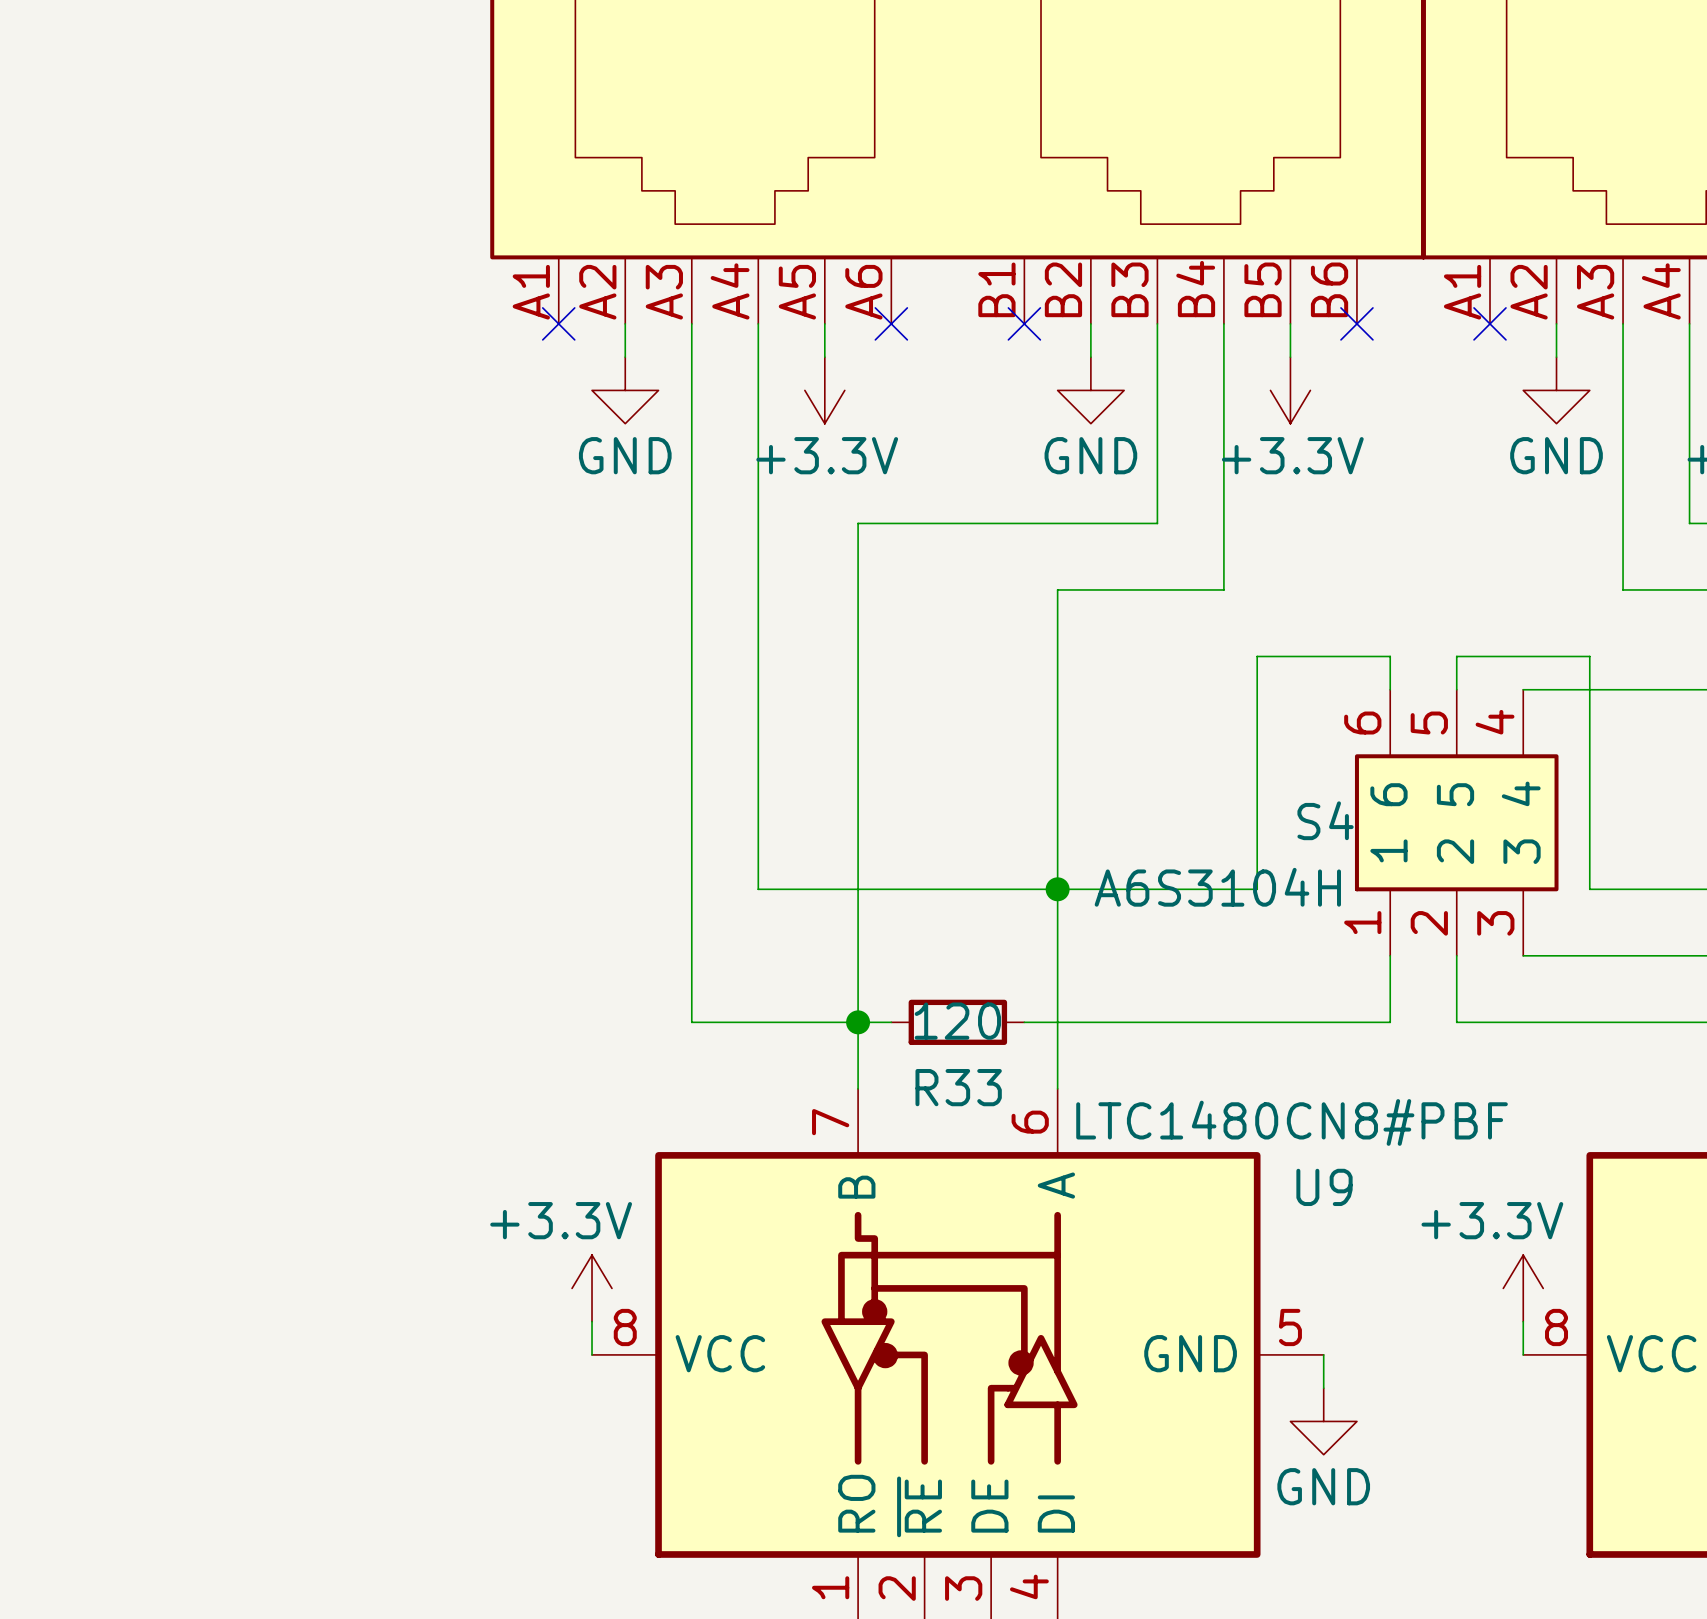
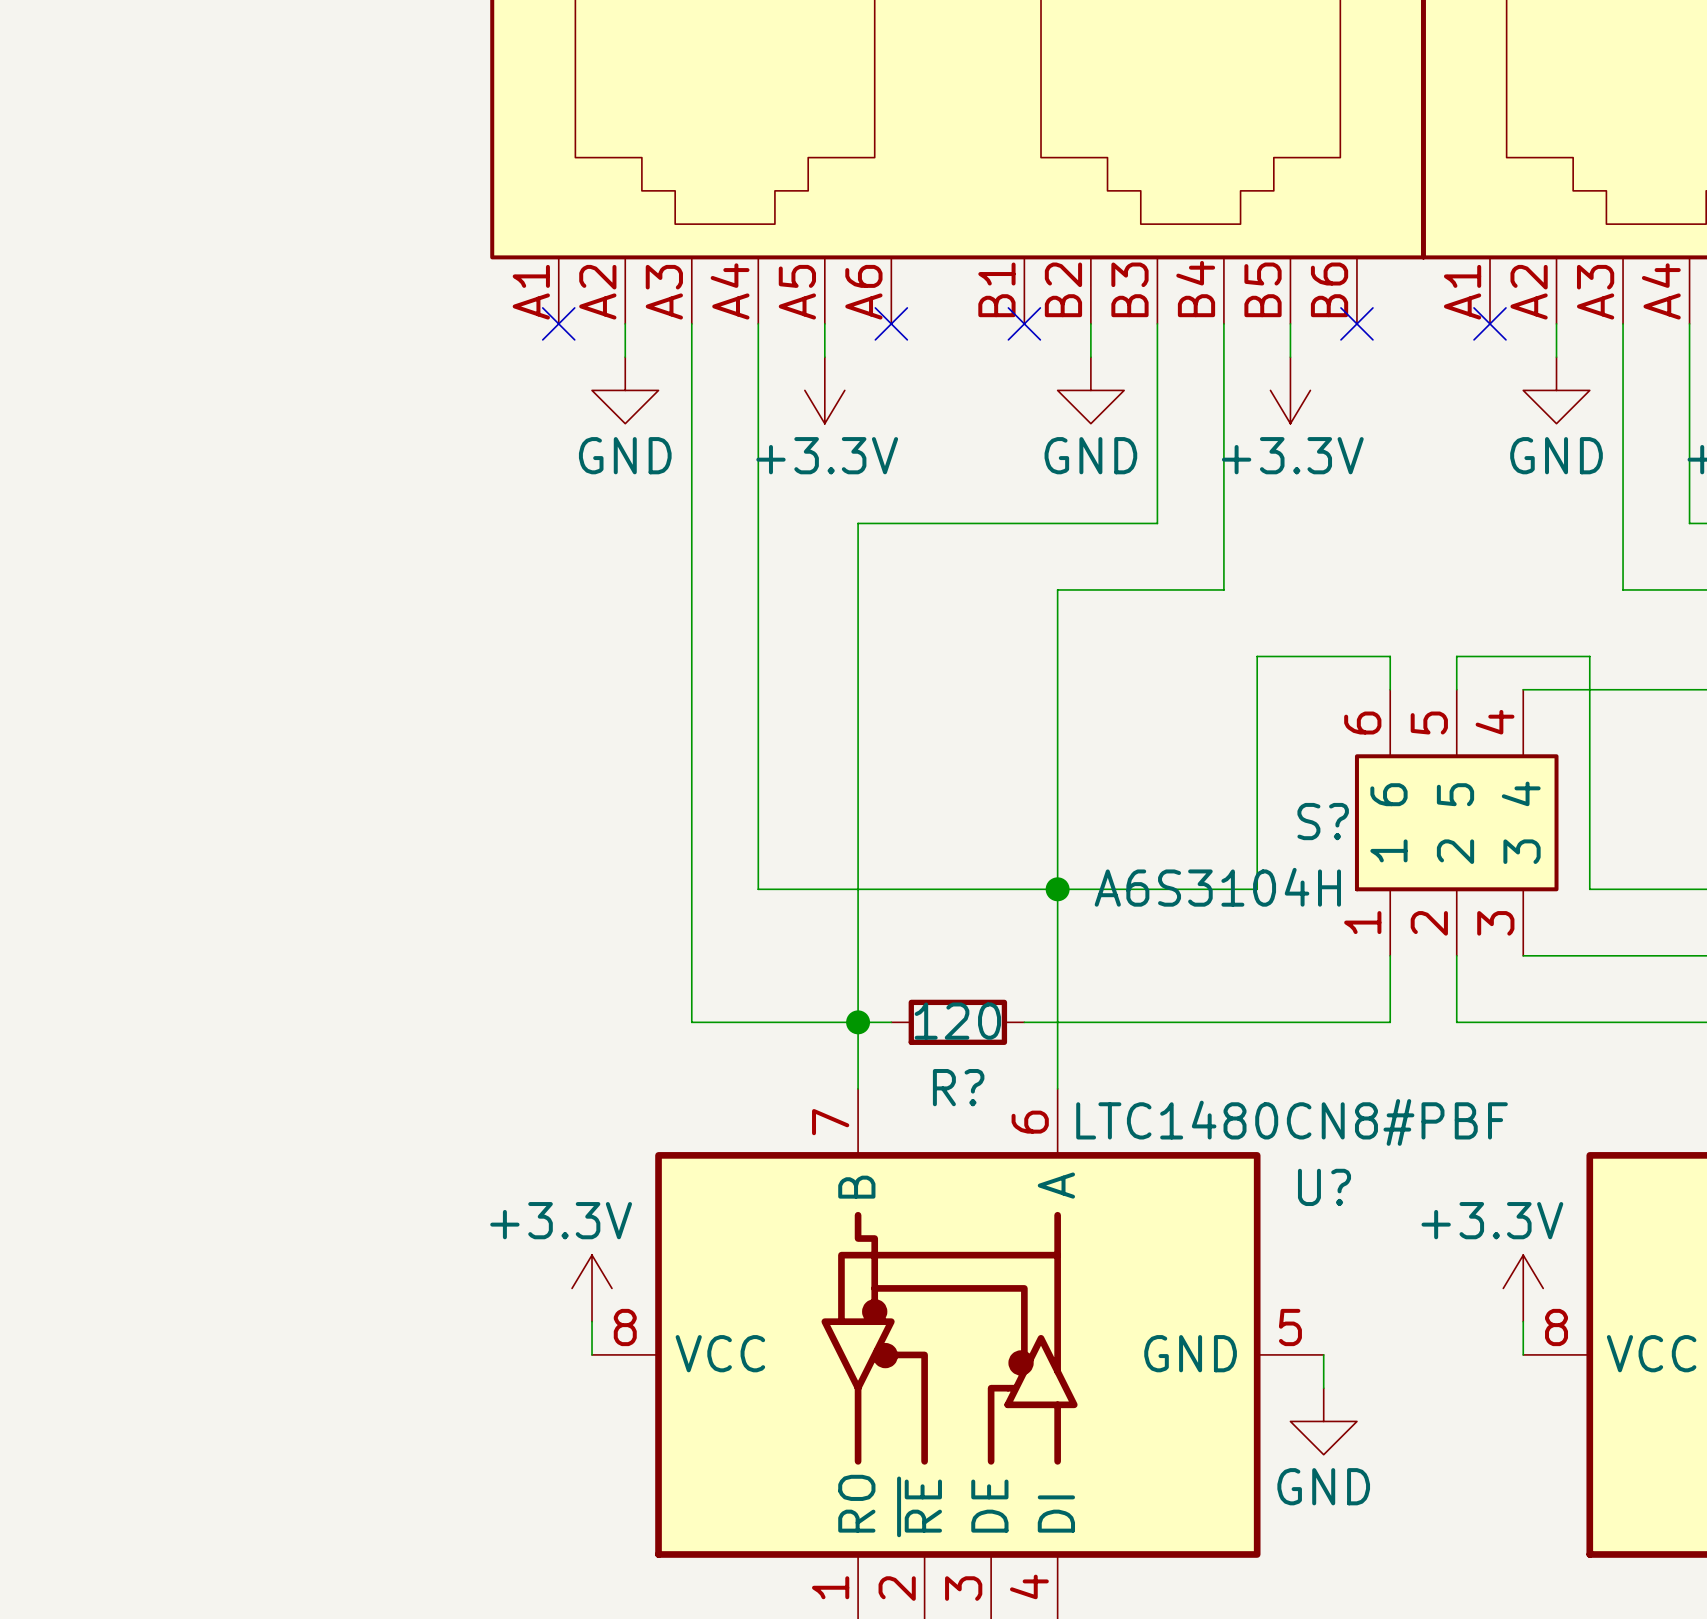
S4 name: S4 (1325, 820) -> S? (1323, 821)
R33 name: R33 (958, 1087) -> R? (958, 1087)
U9 name: U9 (1324, 1187) -> U? (1324, 1187)

